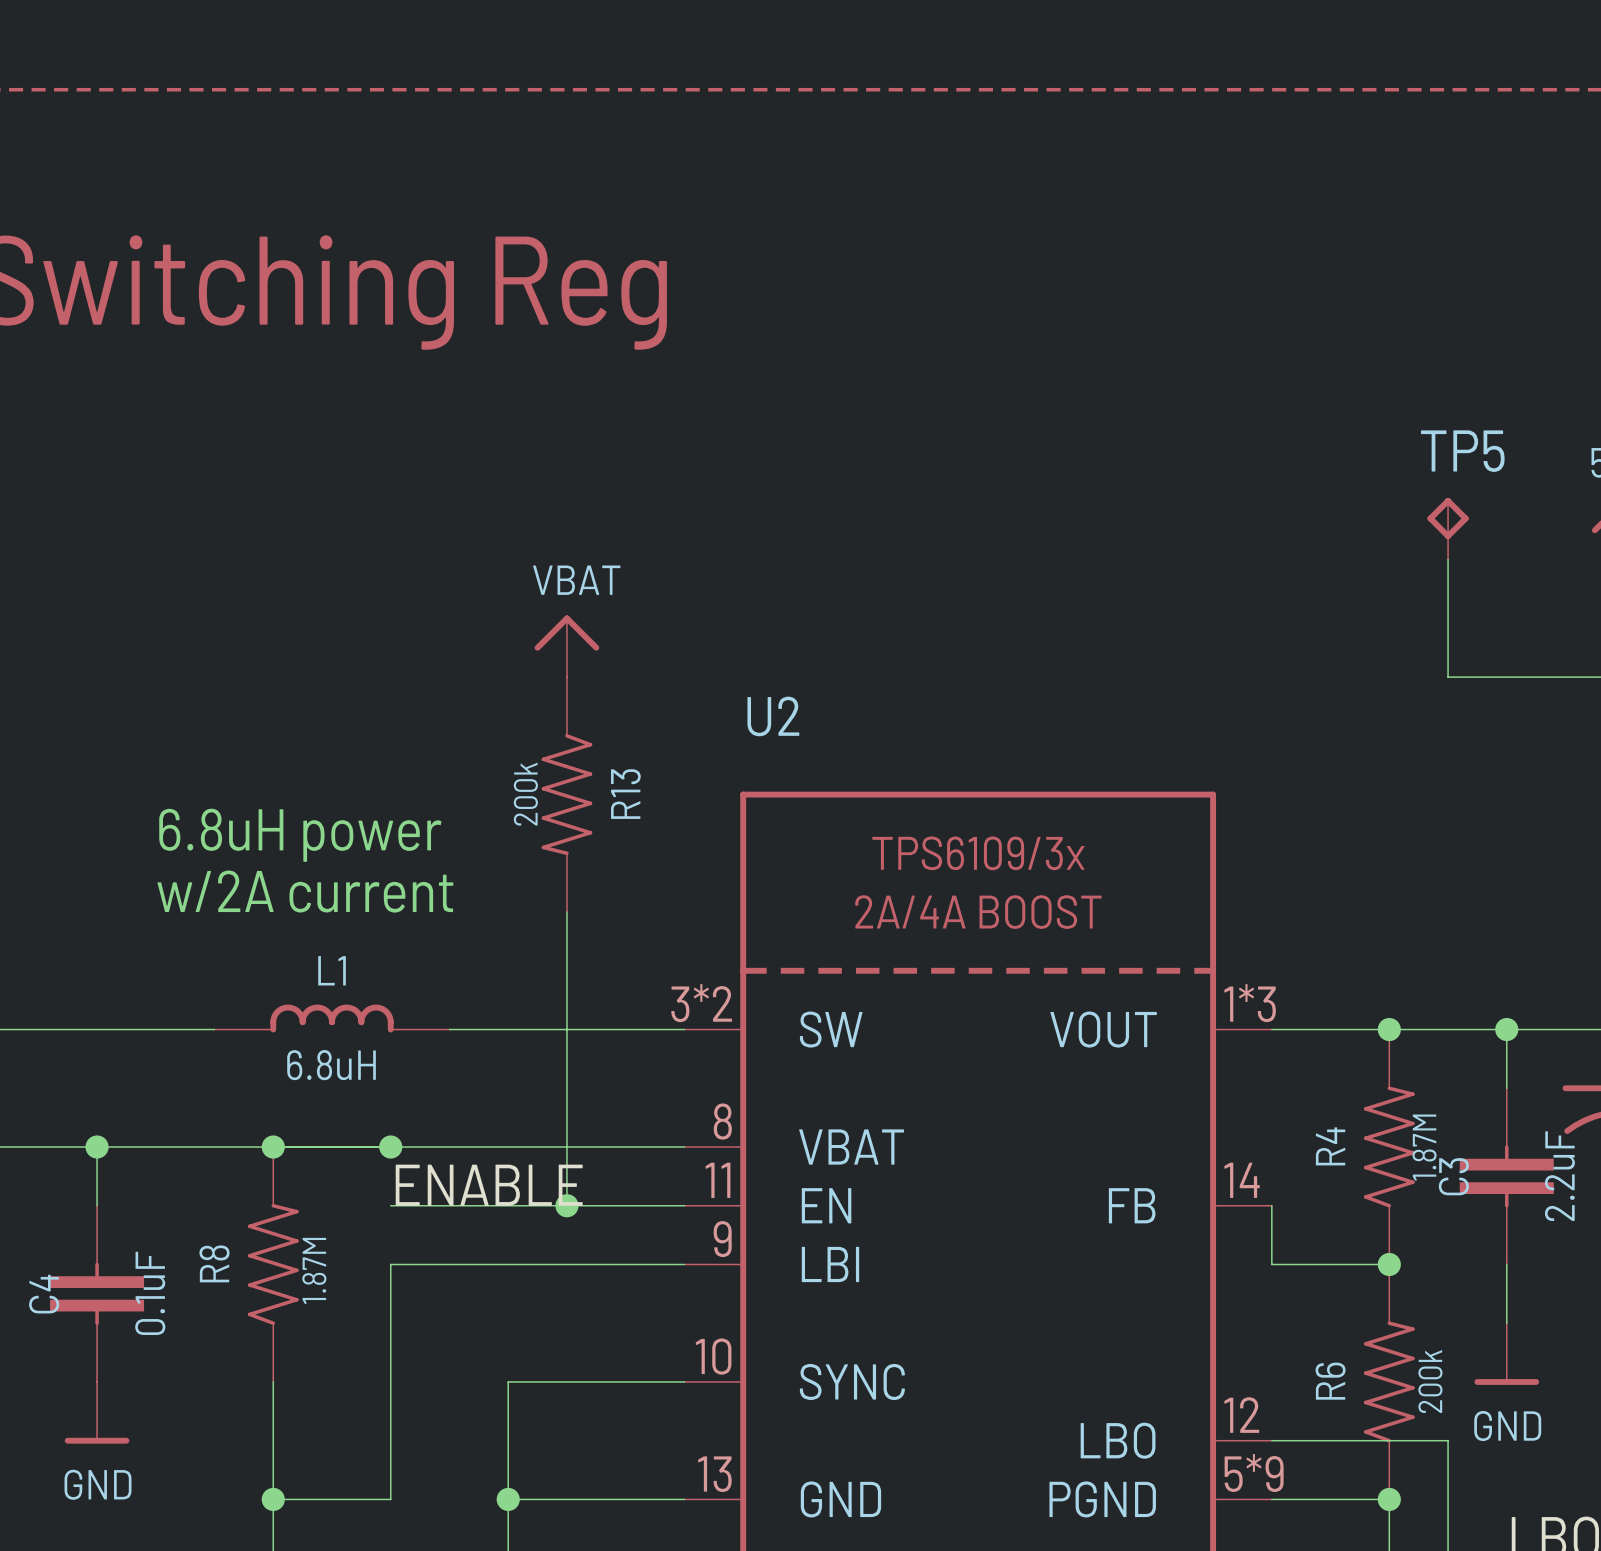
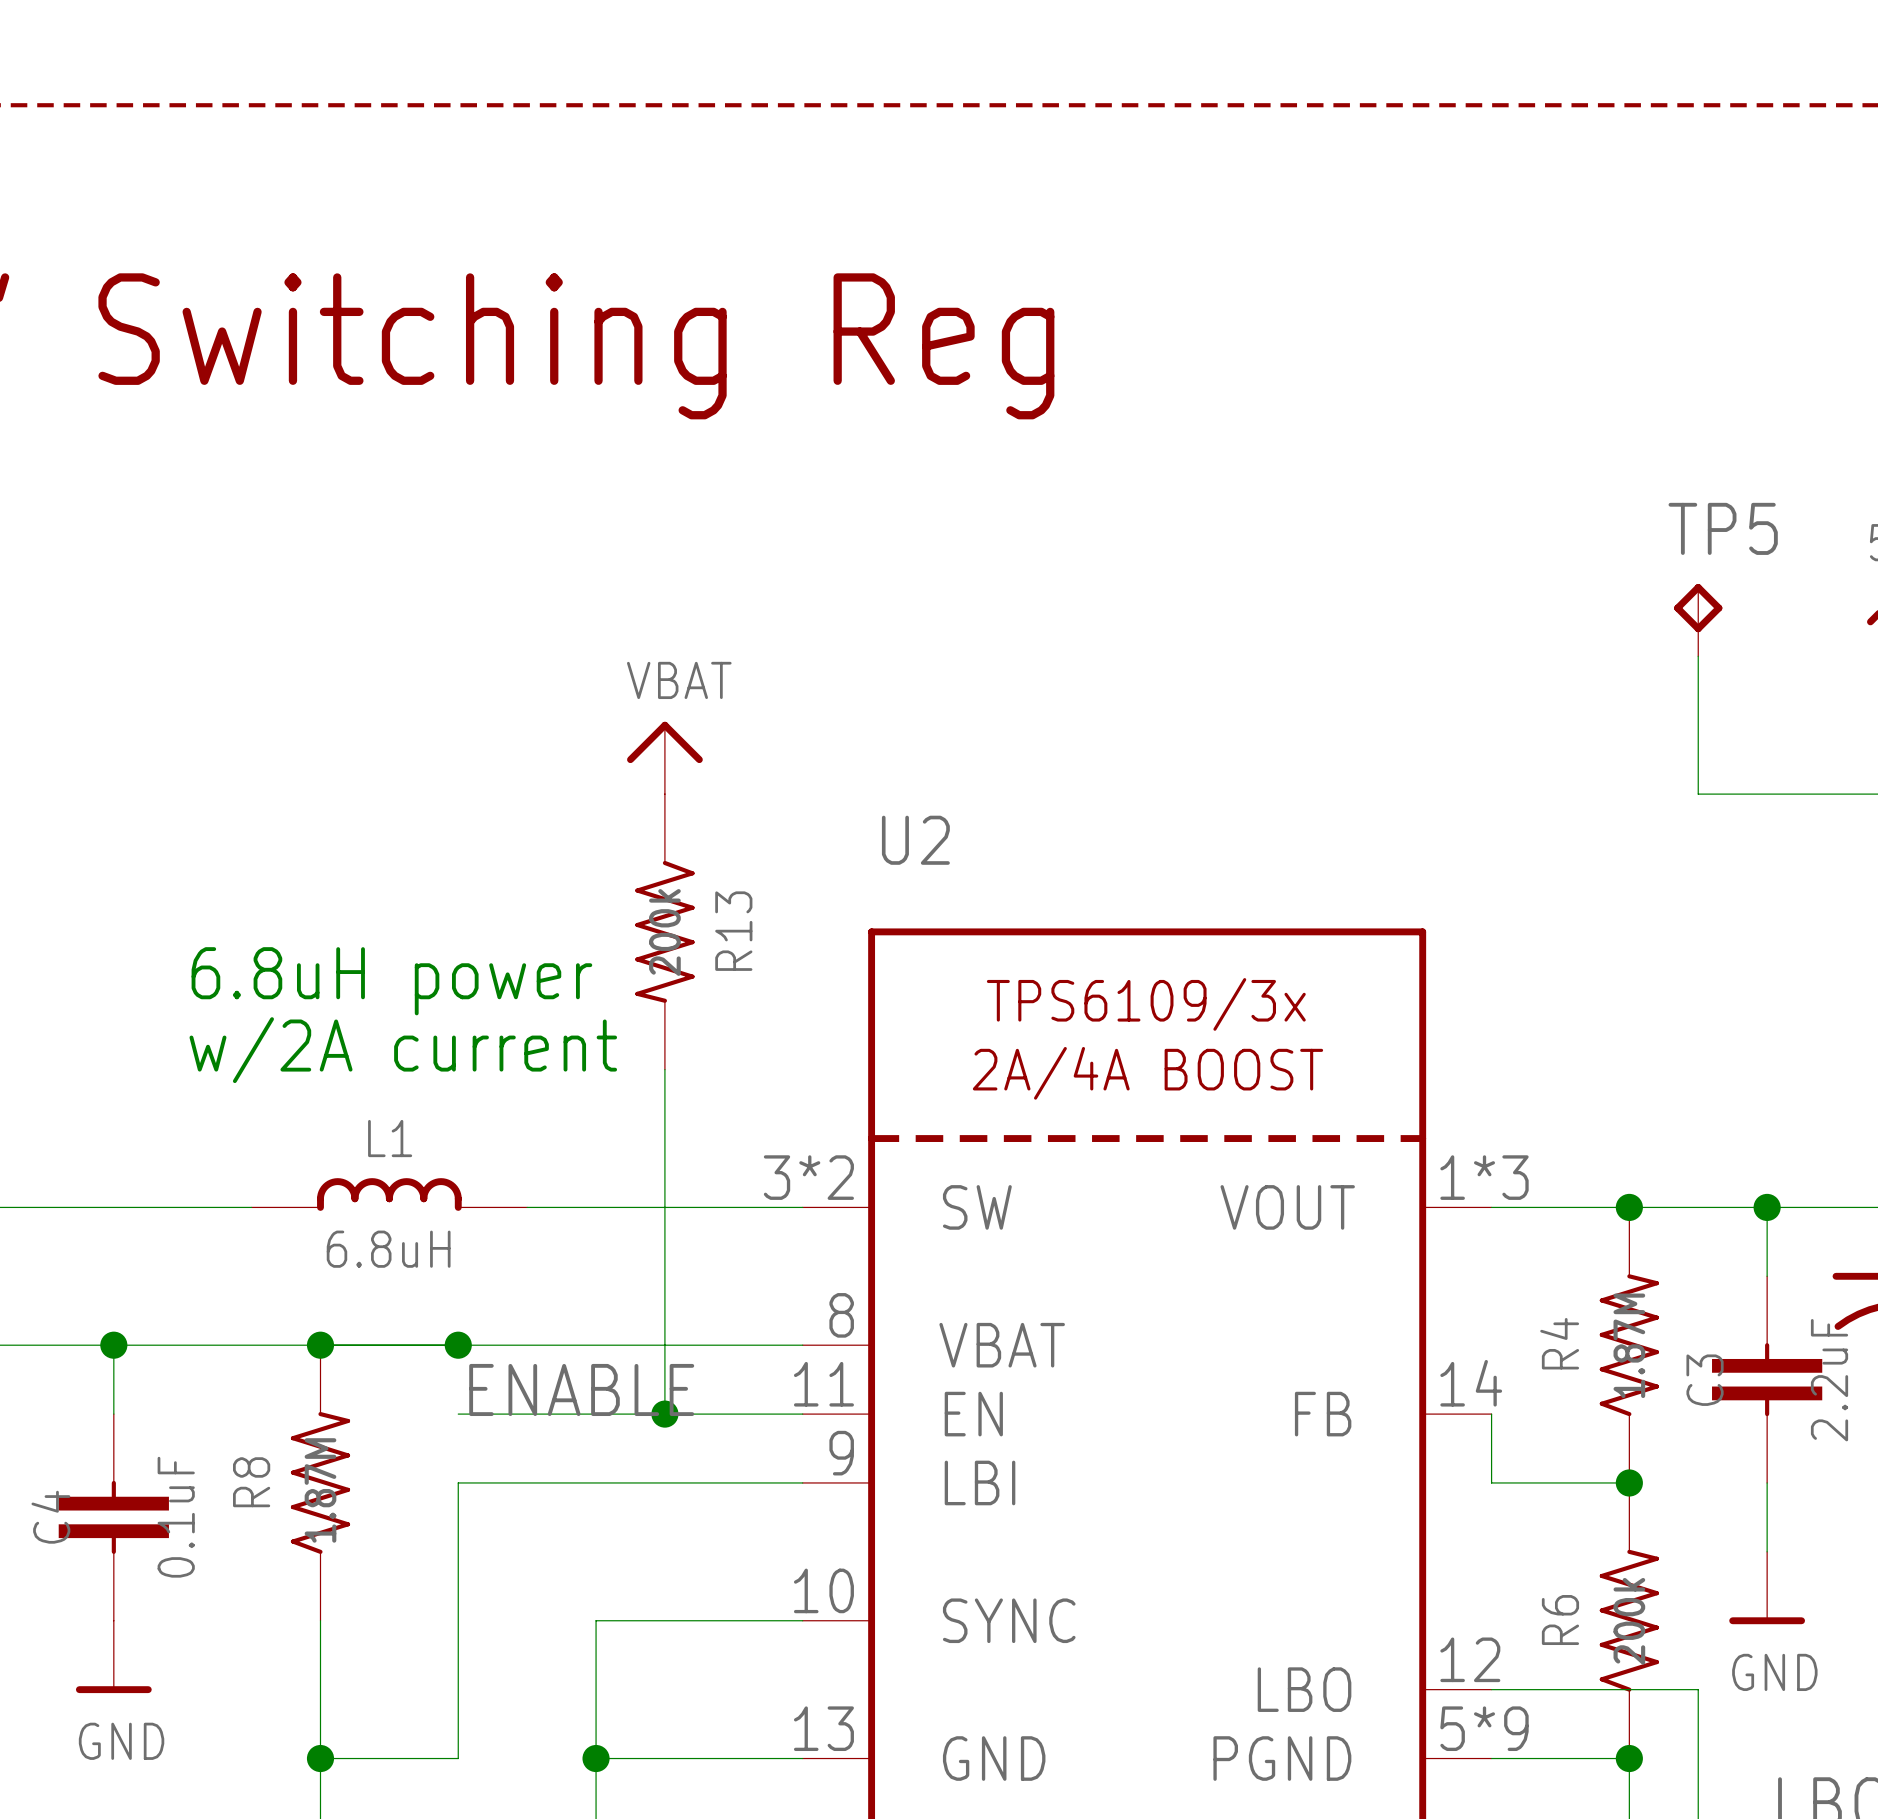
R13 value position: 200k (525, 794) -> 200k (664, 932)
R4 value position: 1.87M (1424, 1147) -> 1.87M (1629, 1345)
R8 value position: 1.87M (314, 1270) -> 1.87M (320, 1490)
R6 value position: 200k (1430, 1381) -> 200k (1629, 1621)

